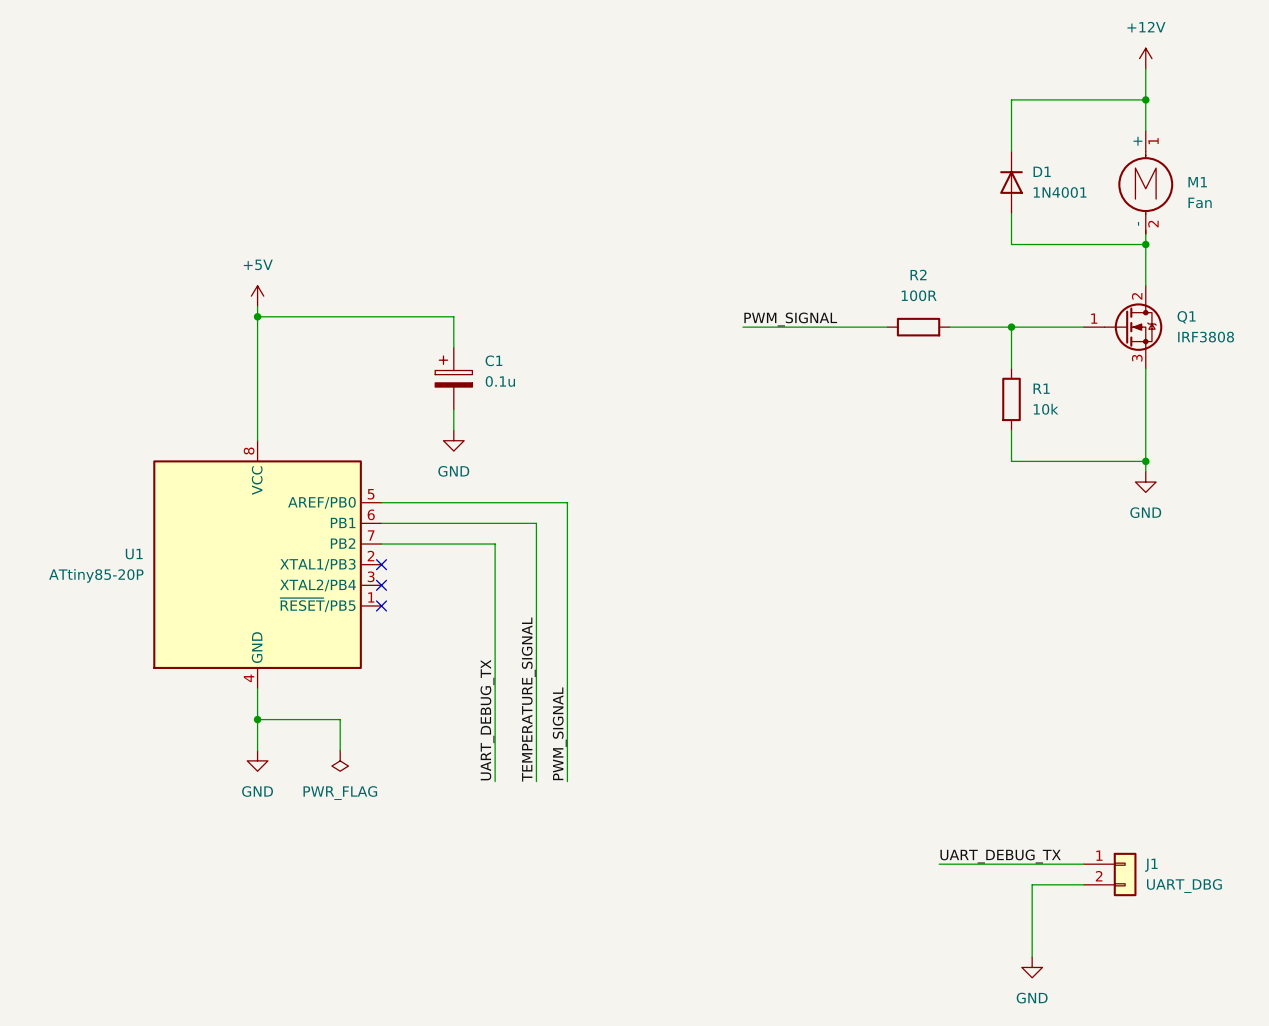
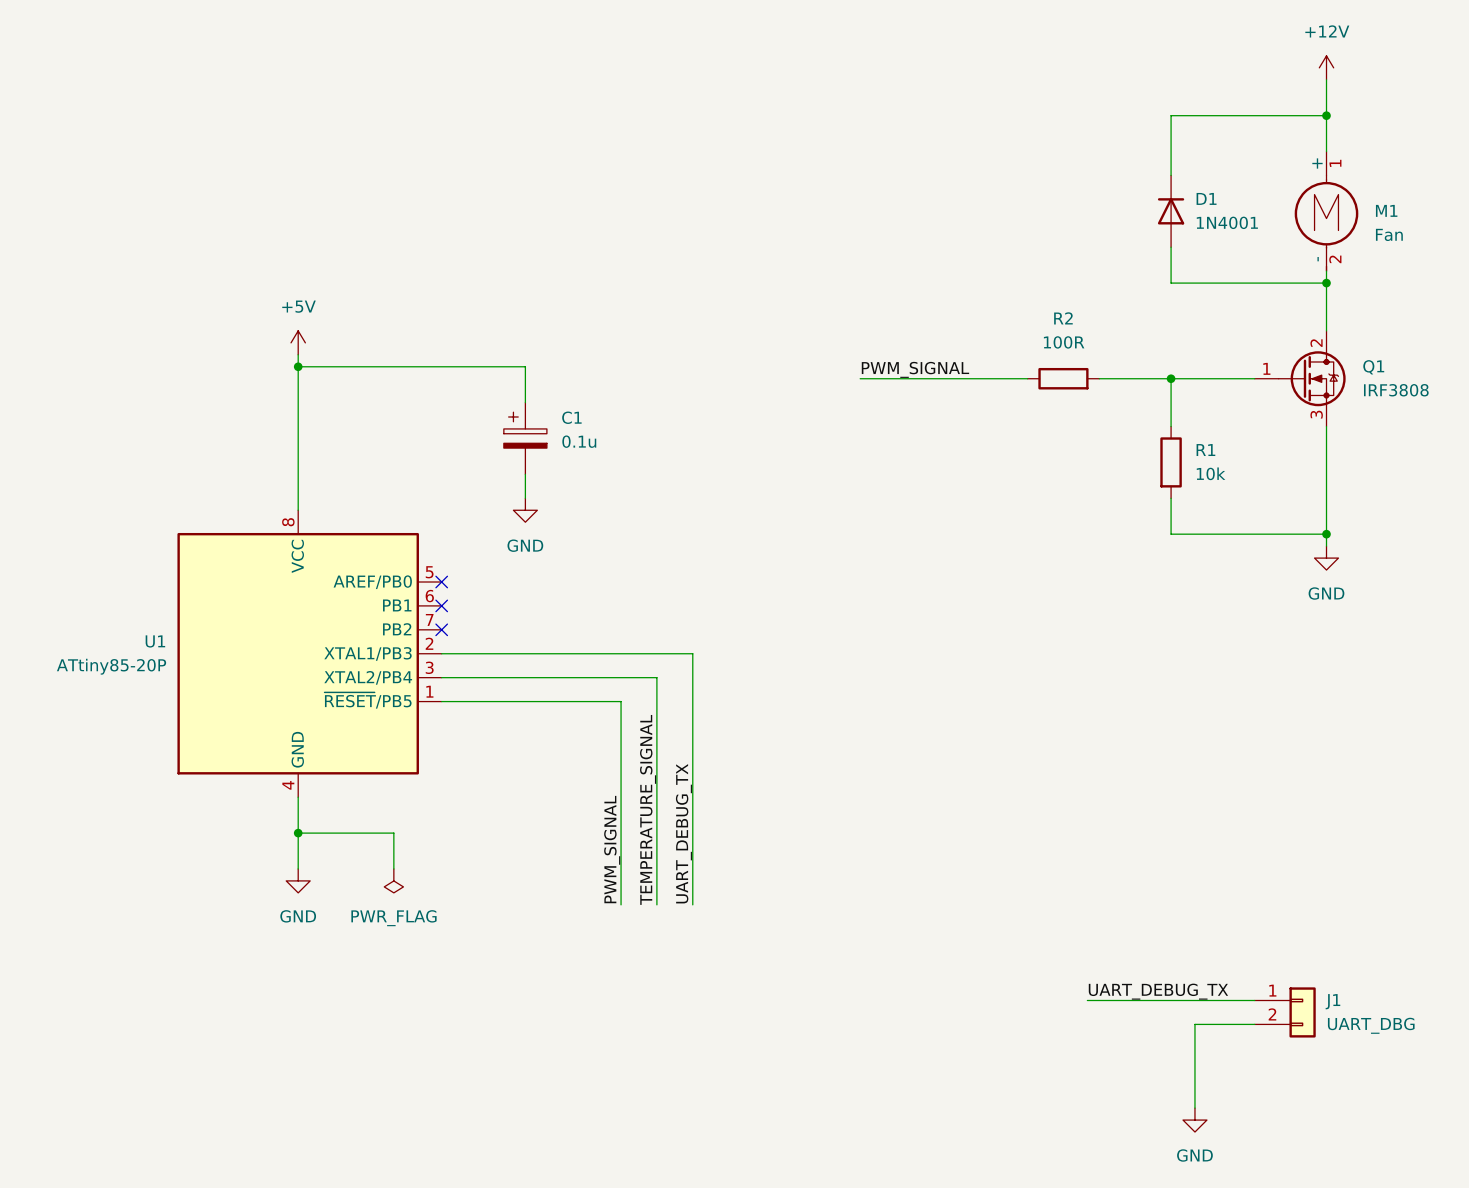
wire: (381, 502) (567, 502) (567, 585) -> (441, 677) (656, 677)
no-connect mark: none -> (441, 582)
wire: (381, 523) (536, 523) (536, 605) -> (441, 701) (621, 701)
no-connect mark: none -> (441, 605)
wire: (381, 544) (495, 544) (495, 781) -> none
no-connect mark: none -> (441, 629)
wire: none -> (441, 653) (692, 653) (692, 904)
no-connect mark: (381, 564) -> none
no-connect mark: (381, 585) -> none
no-connect mark: (381, 605) -> none
label: TEMPERATURE_SIGNAL (528, 699) -> PWM_SIGNAL (612, 849)
label position: UART_DEBUG_TX (487, 720) -> UART_DEBUG_TX (683, 833)
label: PWM_SIGNAL (559, 733) -> TEMPERATURE_SIGNAL (648, 809)

